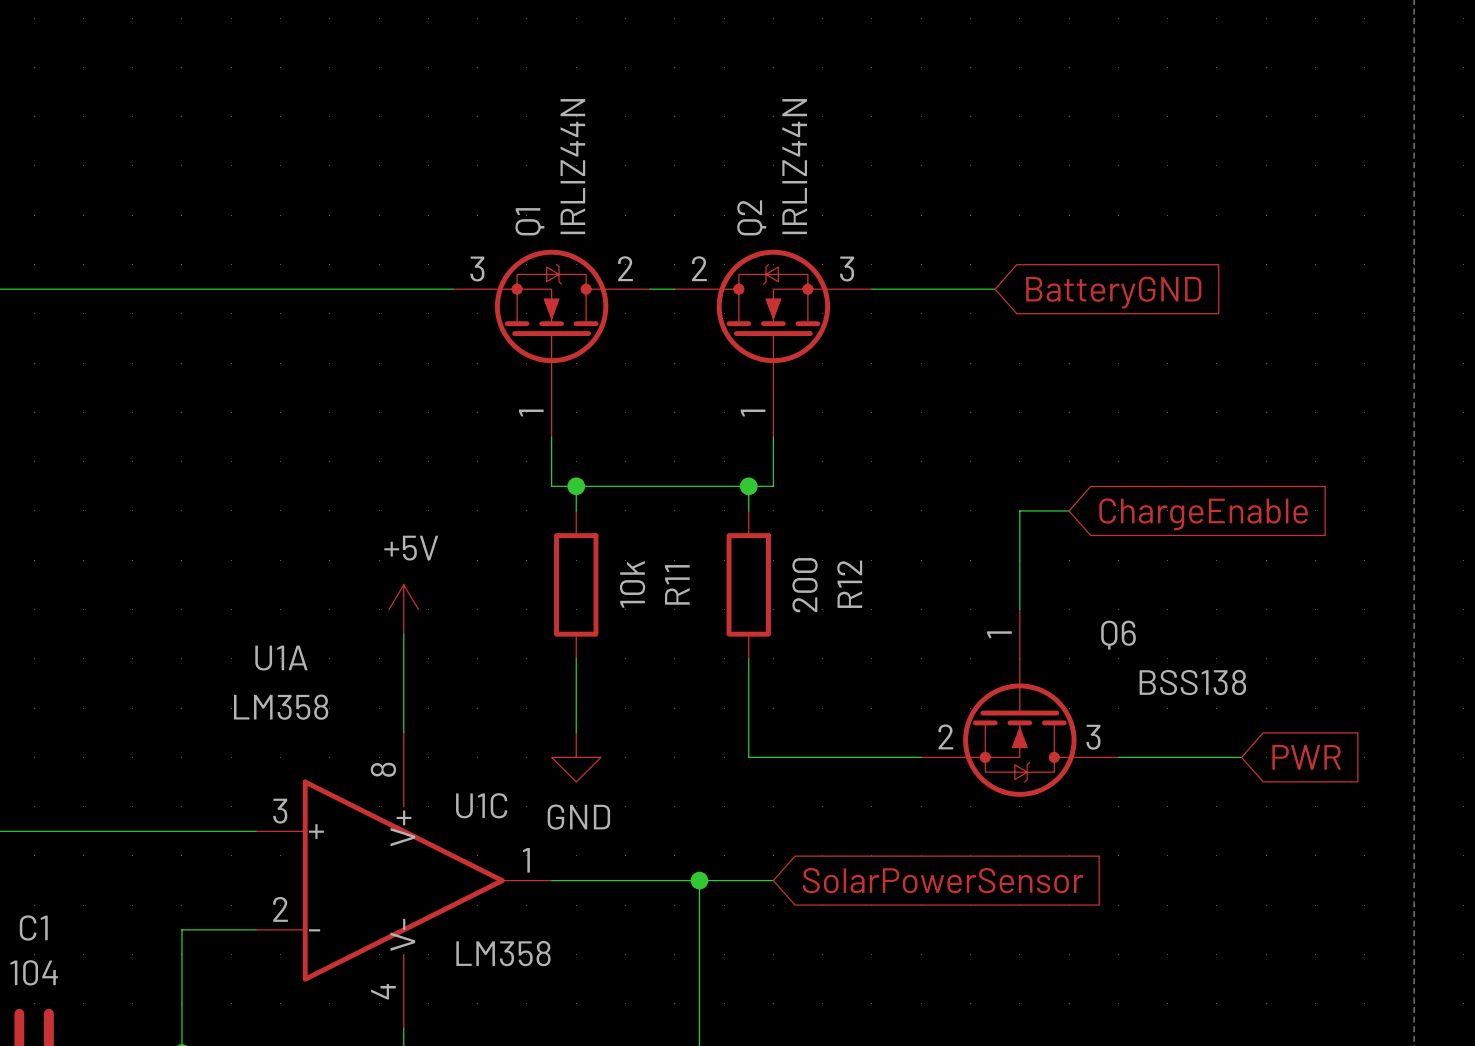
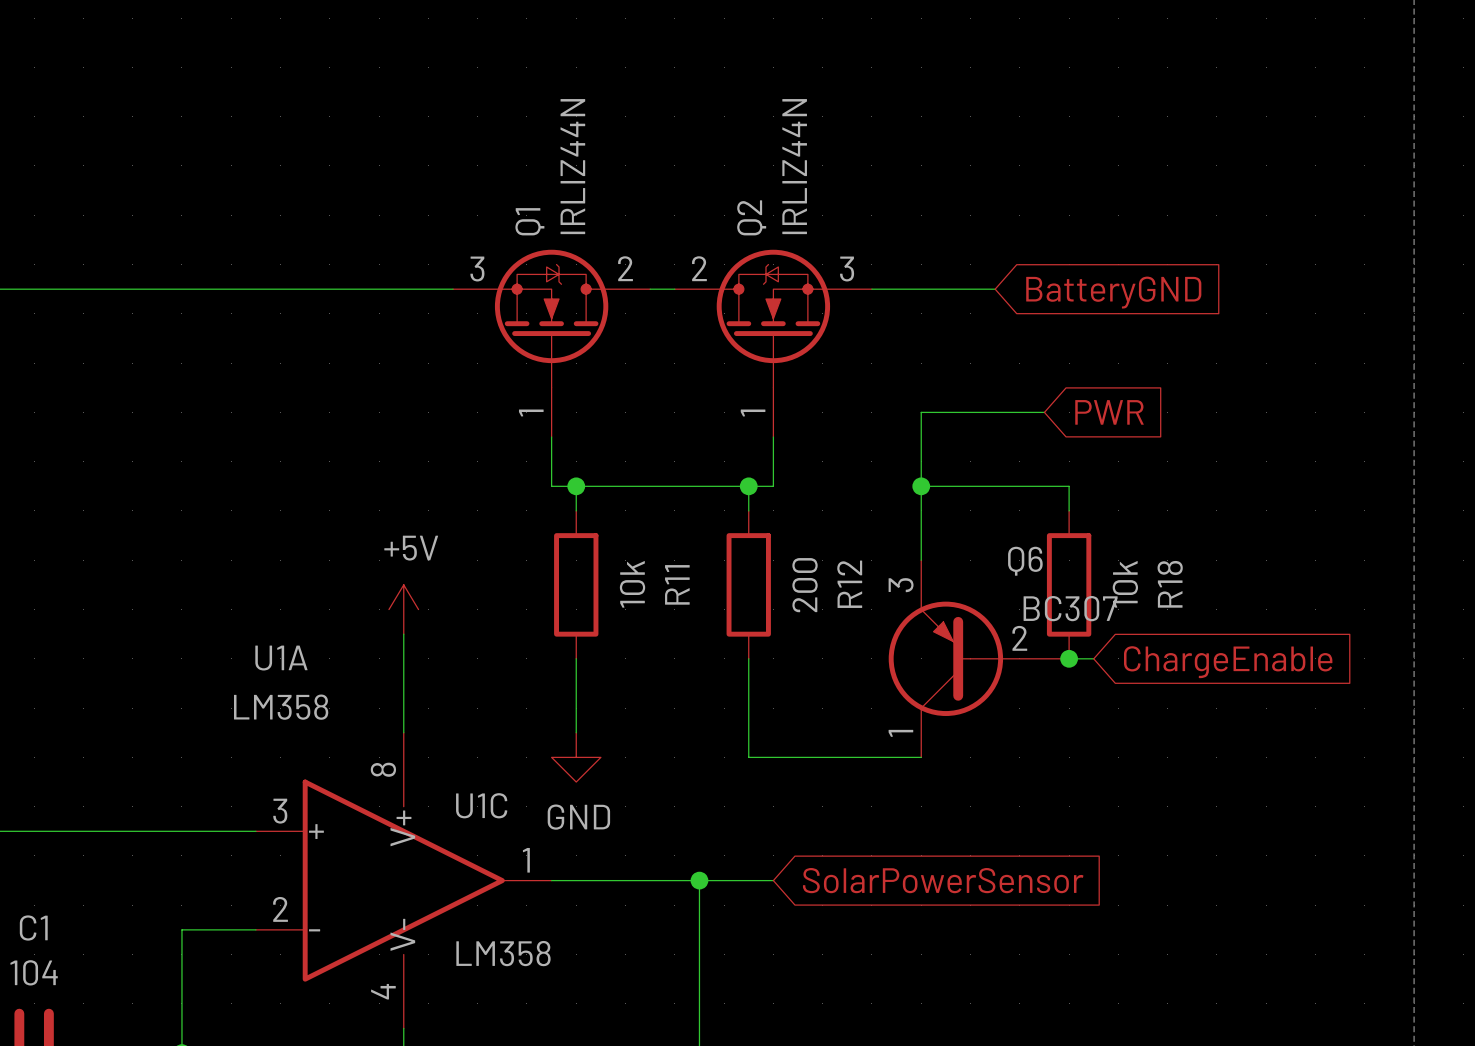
wire: none -> (1044, 412) (921, 412) (921, 560)
junction: none -> (921, 486)
wire: (1069, 510) (1019, 510) (1019, 609) -> (1069, 510) (1069, 486) (921, 486)
global label position: ChargeEnable (1203, 514) -> ChargeEnable (1228, 662)
R18: none -> 10k (1069, 584)
Q6 symbol: [921, 609, 1119, 797] -> [888, 560, 1070, 758]
Q6 name position: Q6 (1118, 635) -> Q6 (1025, 561)
wire: none -> (1069, 658) (1093, 658)
junction: none -> (1069, 658)
Q6 value: BSS138 (1192, 682) -> BC307 (1070, 608)
wire: (1118, 757) (1241, 757) -> none
global label position: PWR (1306, 757) -> PWR (1109, 412)

